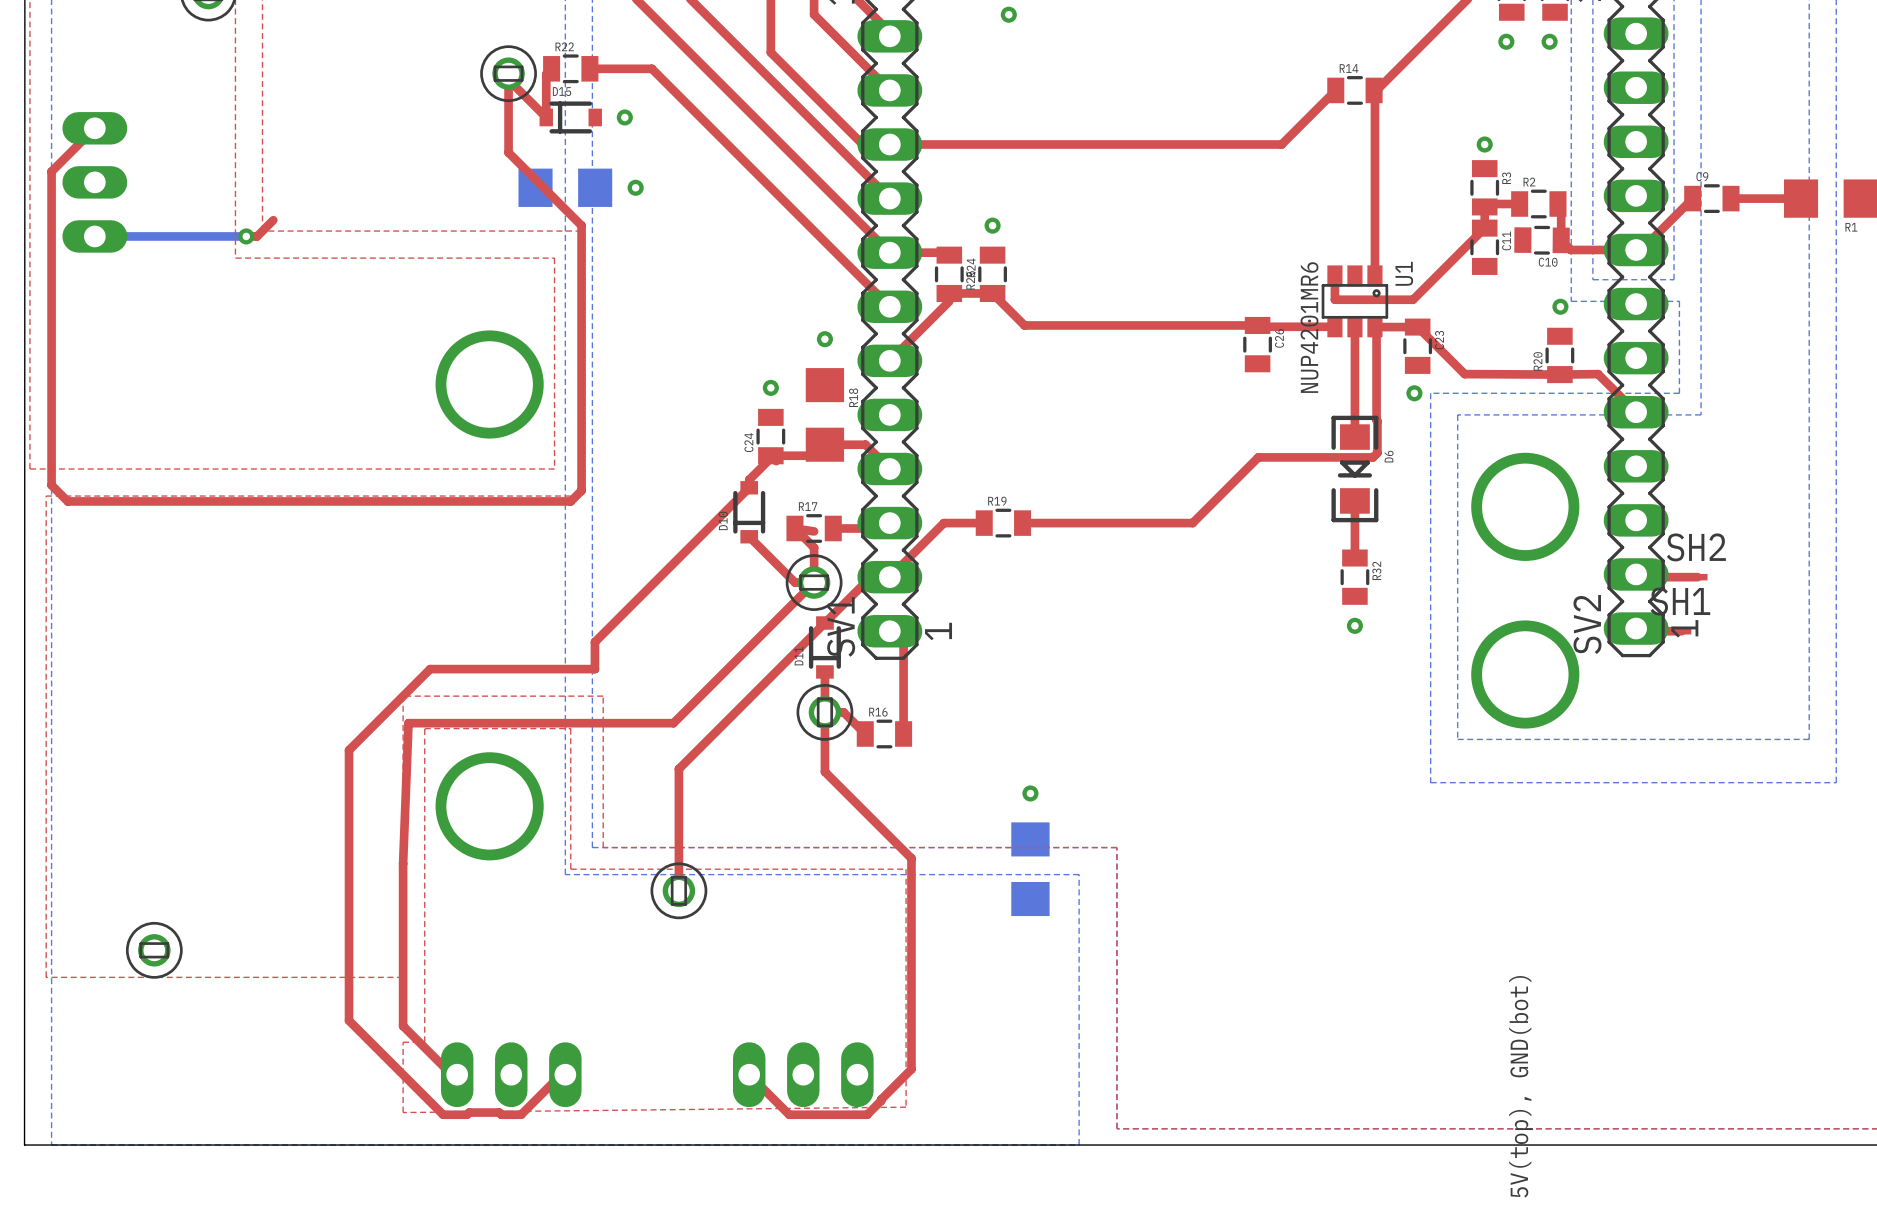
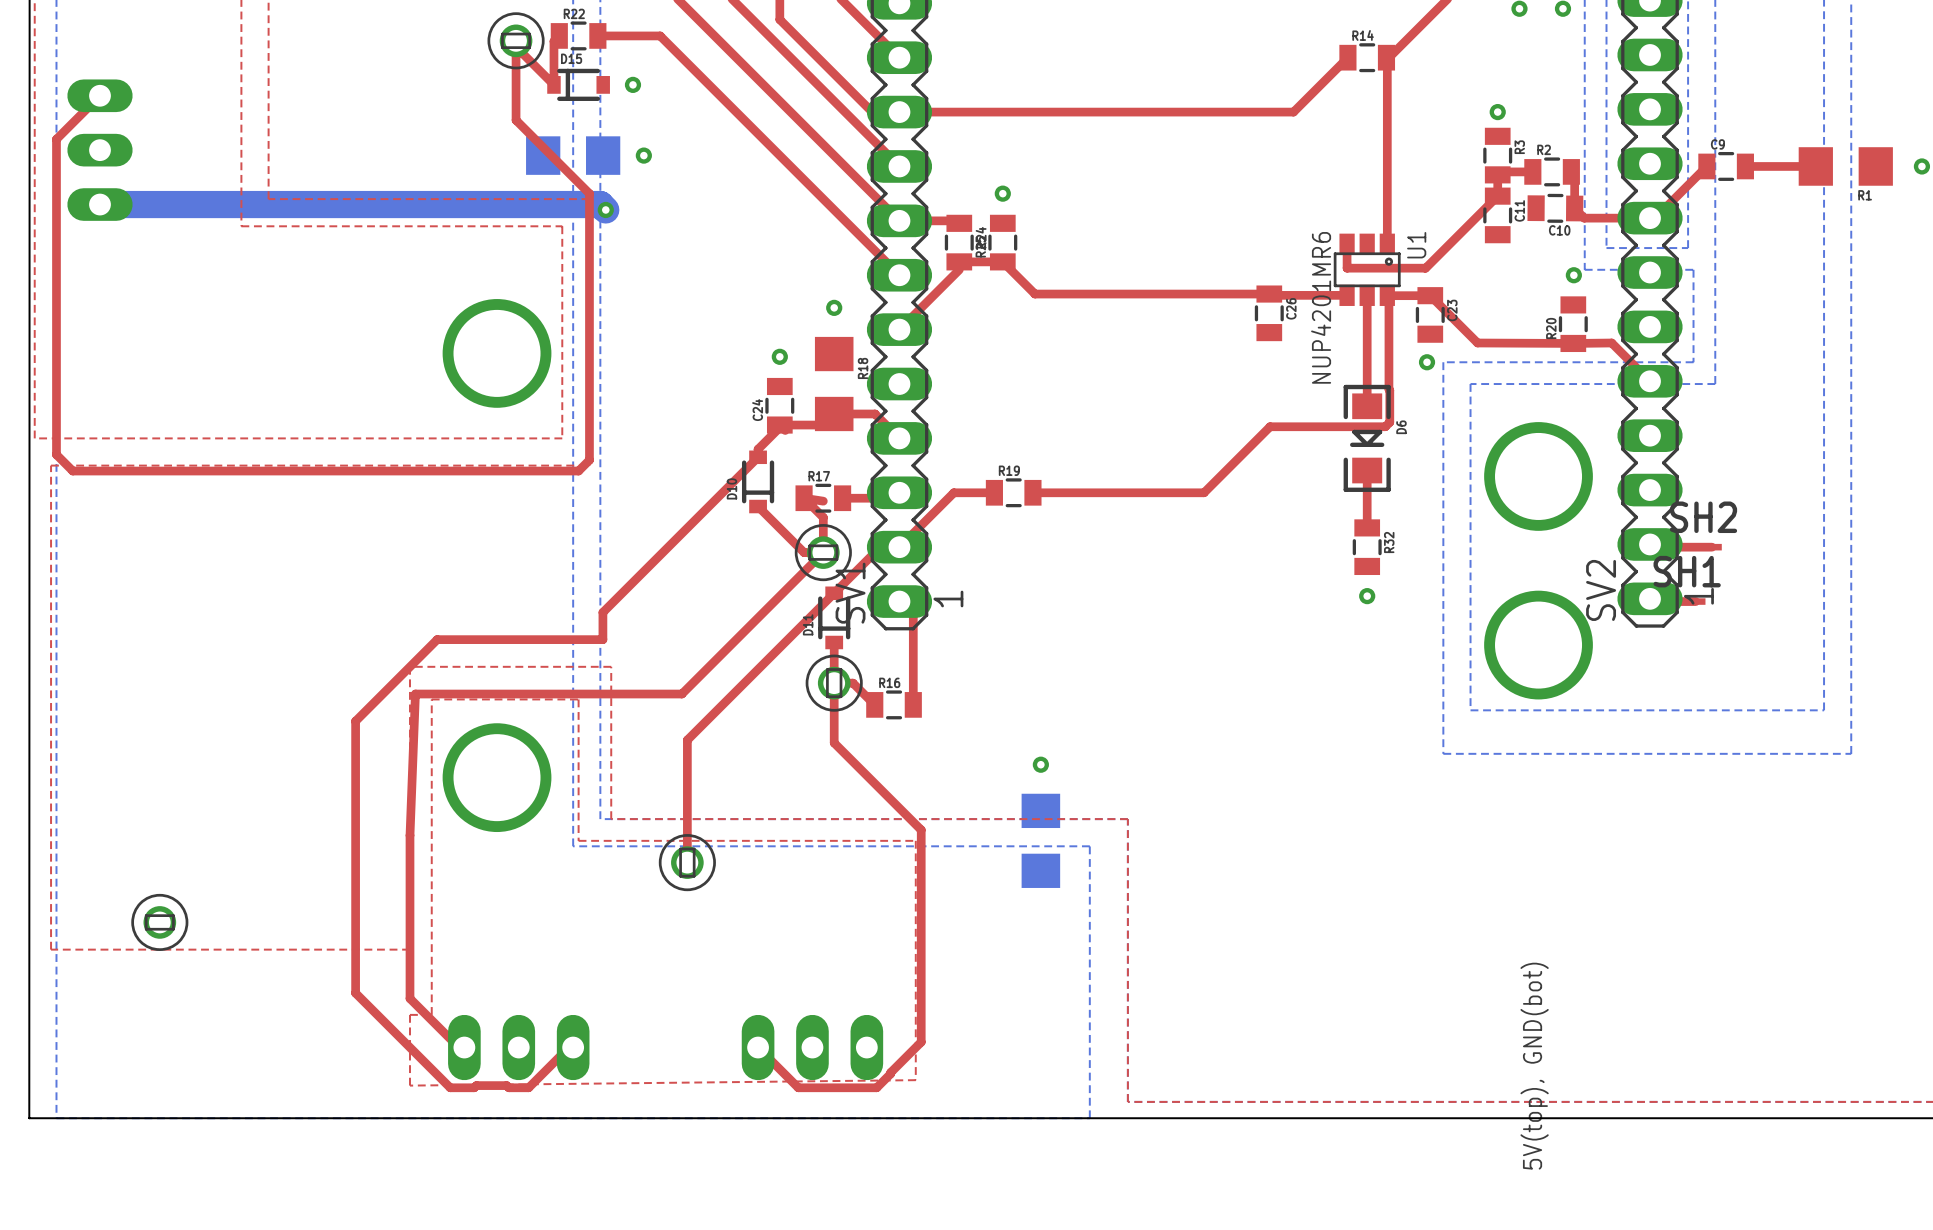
top track: (273, 220) (257, 236) (246, 236) -> none
bottom track width: thin (94, 236) (246, 236) -> thick (99, 204) (252, 204)
bottom track: none -> (252, 204) (600, 204) (605, 209)
via: (246, 236) -> none
via: none -> (605, 209)

